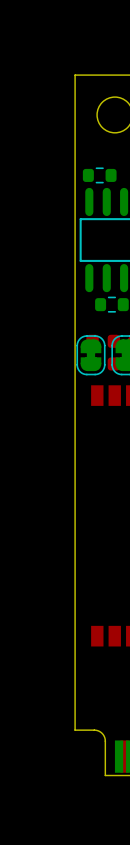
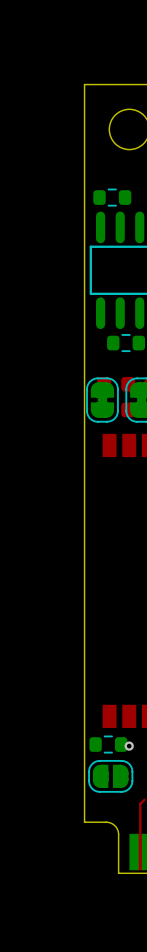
part: none -> (108, 744)
via: none -> (129, 746)
part: none -> (110, 776)
top track: none -> (144, 799) (140, 803) (140, 852)

